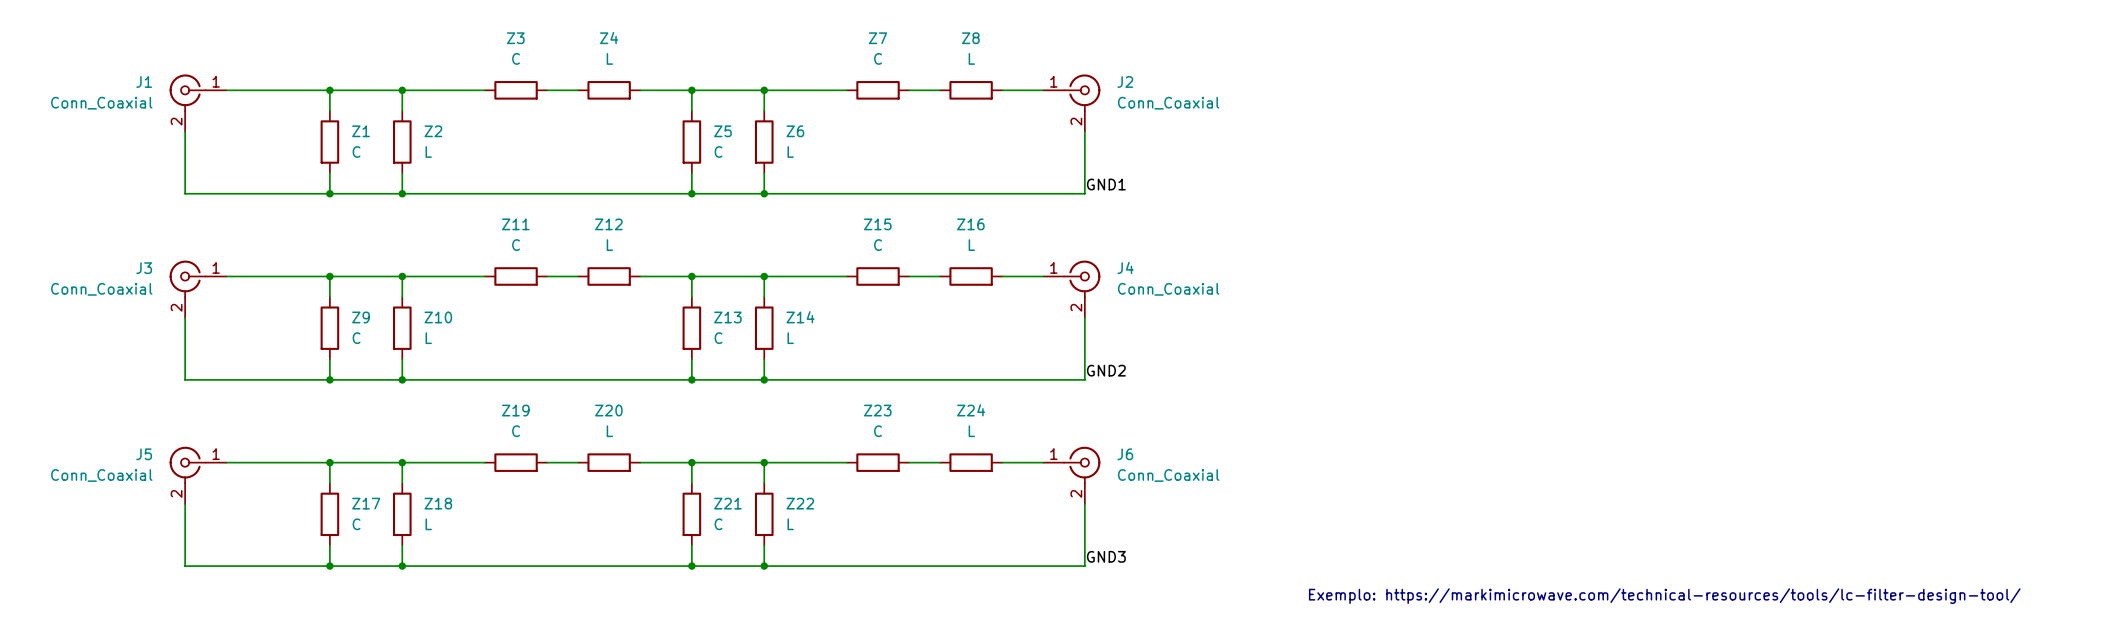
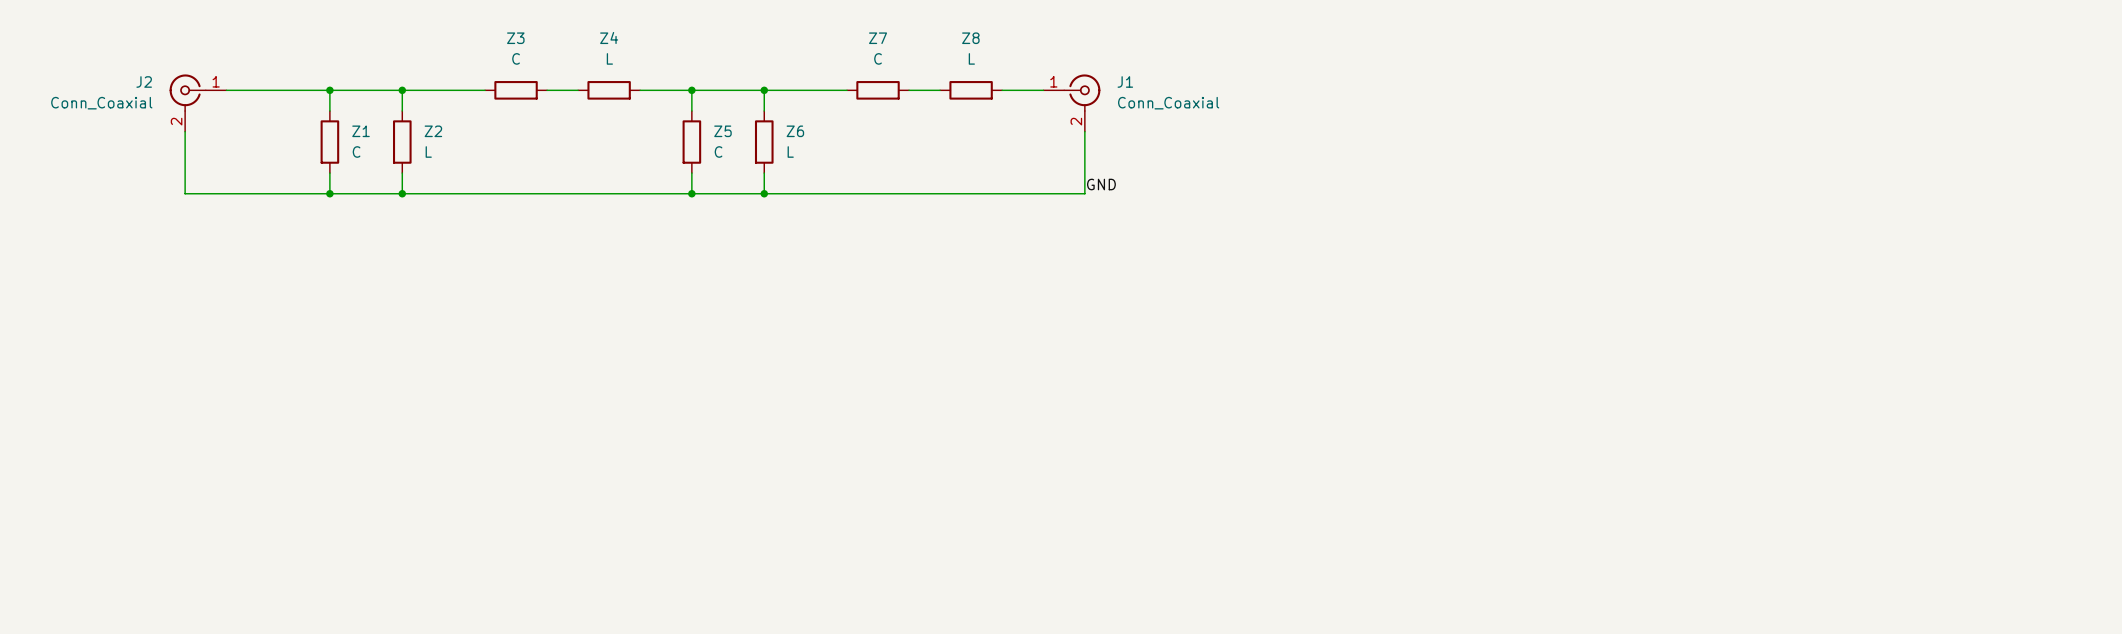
J1 name: J1 (144, 81) -> J2 (144, 81)
J2 name: J2 (1125, 81) -> J1 (1125, 81)
label: GND1 (1106, 184) -> GND (1101, 184)
wire: (226, 276) (485, 276) -> none
wire: (329, 276) (329, 297) -> none
junction: (329, 276) -> none
wire: (402, 276) (402, 297) -> none
junction: (402, 276) -> none
Z11: C (516, 276) -> none
wire: (547, 276) (578, 276) -> none
Z12: L (609, 276) -> none
wire: (640, 276) (847, 276) -> none
wire: (691, 276) (691, 297) -> none
junction: (691, 276) -> none
wire: (764, 276) (764, 297) -> none
junction: (764, 276) -> none
Z15: C (878, 276) -> none
wire: (909, 276) (940, 276) -> none
Z16: L (971, 276) -> none
wire: (1002, 276) (1043, 276) -> none
J3: Conn_Coaxial (198, 289) -> none
J4: Conn_Coaxial (1071, 289) -> none
wire: (185, 317) (185, 379) (1084, 379) (1084, 317) -> none
Z9: C (329, 328) -> none
Z10: L (402, 328) -> none
Z13: C (691, 328) -> none
Z14: L (764, 328) -> none
wire: (329, 359) (329, 379) -> none
wire: (402, 359) (402, 379) -> none
wire: (691, 359) (691, 379) -> none
wire: (764, 359) (764, 379) -> none
label: GND2 (1106, 370) -> none
junction: (329, 379) -> none
junction: (402, 379) -> none
junction: (691, 379) -> none
junction: (764, 379) -> none
wire: (226, 462) (485, 462) -> none
wire: (329, 462) (329, 483) -> none
junction: (329, 462) -> none
wire: (402, 462) (402, 483) -> none
junction: (402, 462) -> none
Z19: C (516, 462) -> none
wire: (547, 462) (578, 462) -> none
Z20: L (609, 462) -> none
wire: (640, 462) (847, 462) -> none
wire: (691, 462) (691, 483) -> none
junction: (691, 462) -> none
wire: (764, 462) (764, 483) -> none
junction: (764, 462) -> none
Z23: C (878, 462) -> none
wire: (909, 462) (940, 462) -> none
Z24: L (971, 462) -> none
wire: (1002, 462) (1043, 462) -> none
J5: Conn_Coaxial (198, 475) -> none
J6: Conn_Coaxial (1071, 475) -> none
wire: (185, 504) (185, 566) (1084, 566) (1084, 504) -> none
Z17: C (329, 514) -> none
Z18: L (402, 514) -> none
Z21: C (691, 514) -> none
Z22: L (764, 514) -> none
wire: (329, 545) (329, 566) -> none
wire: (402, 545) (402, 566) -> none
wire: (691, 545) (691, 566) -> none
wire: (764, 545) (764, 566) -> none
label: GND3 (1106, 556) -> none
junction: (329, 566) -> none
junction: (402, 566) -> none
junction: (691, 566) -> none
junction: (764, 566) -> none
text: Exemplo: https://markimicrowave.com/technical-resources/tools/lc-filter-design-tool/ (1664, 596) -> none

